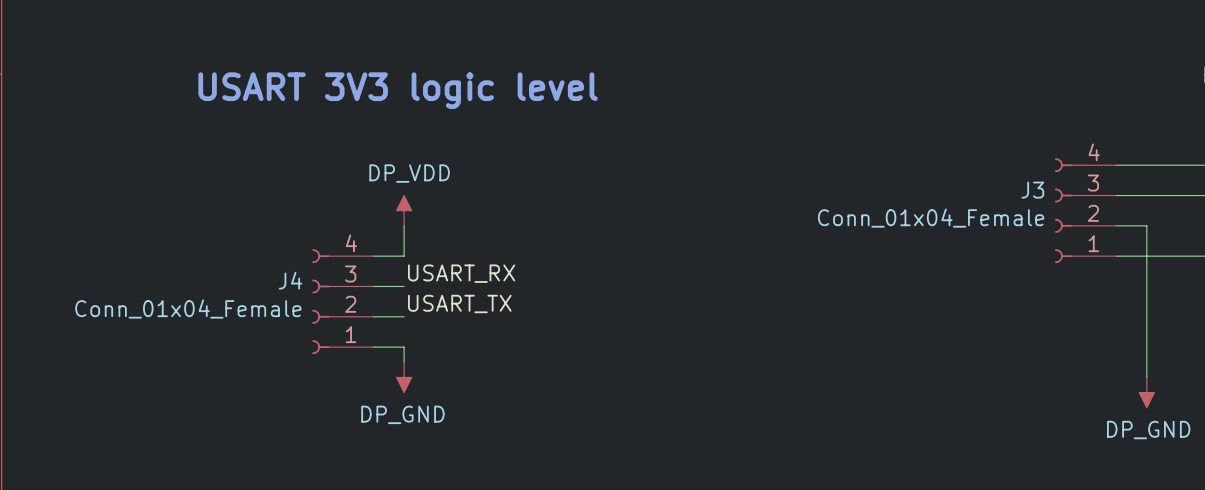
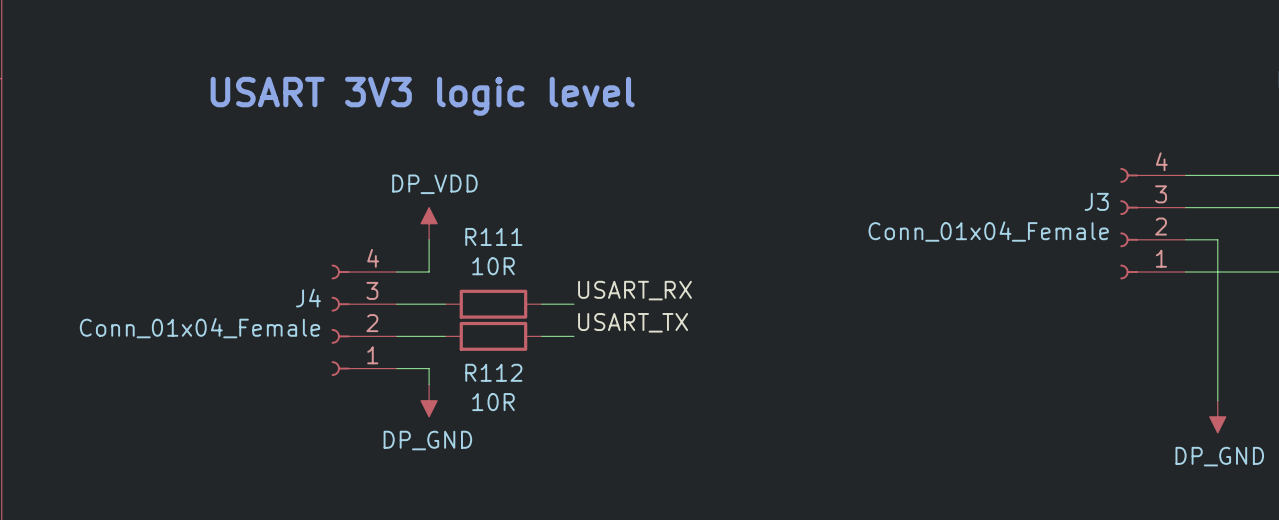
label position: USART_RX (461, 273) -> USART_RX (635, 290)
wire: none -> (429, 304) (445, 304)
R111: none -> 10R (493, 304)
wire: none -> (541, 304) (573, 304)
label position: USART_TX (459, 303) -> USART_TX (633, 322)
wire: none -> (429, 336) (445, 336)
R112: none -> 10R (493, 336)
wire: none -> (541, 336) (573, 336)

